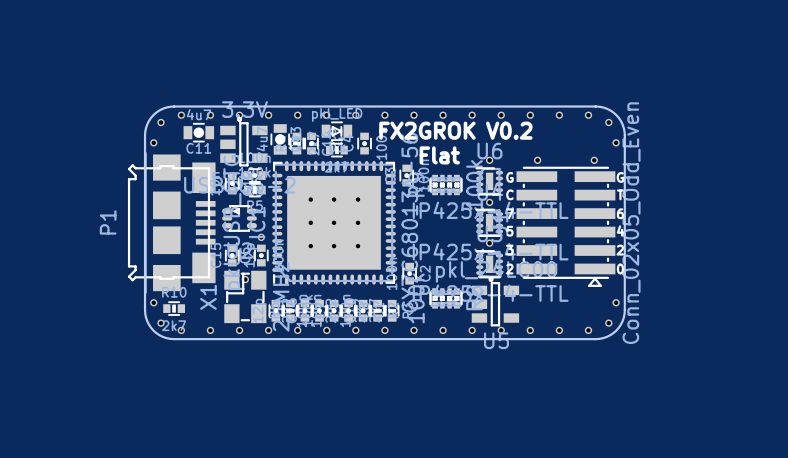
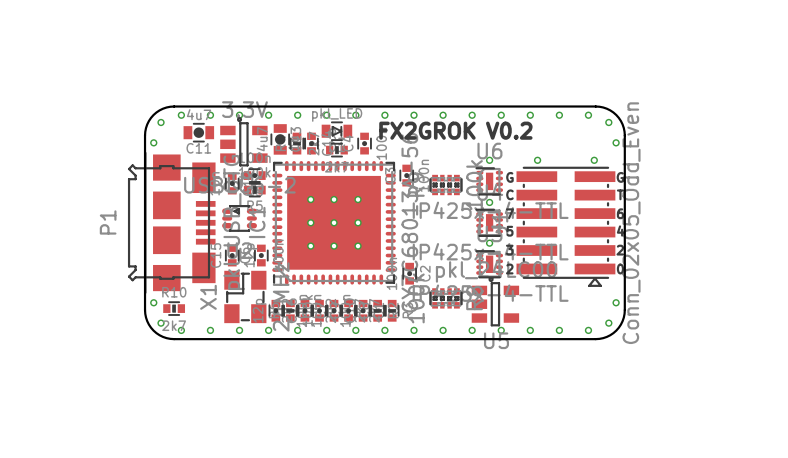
text: Flat (439, 155) -> none
part: (261, 237) -> none
part: (245, 279) -> none

